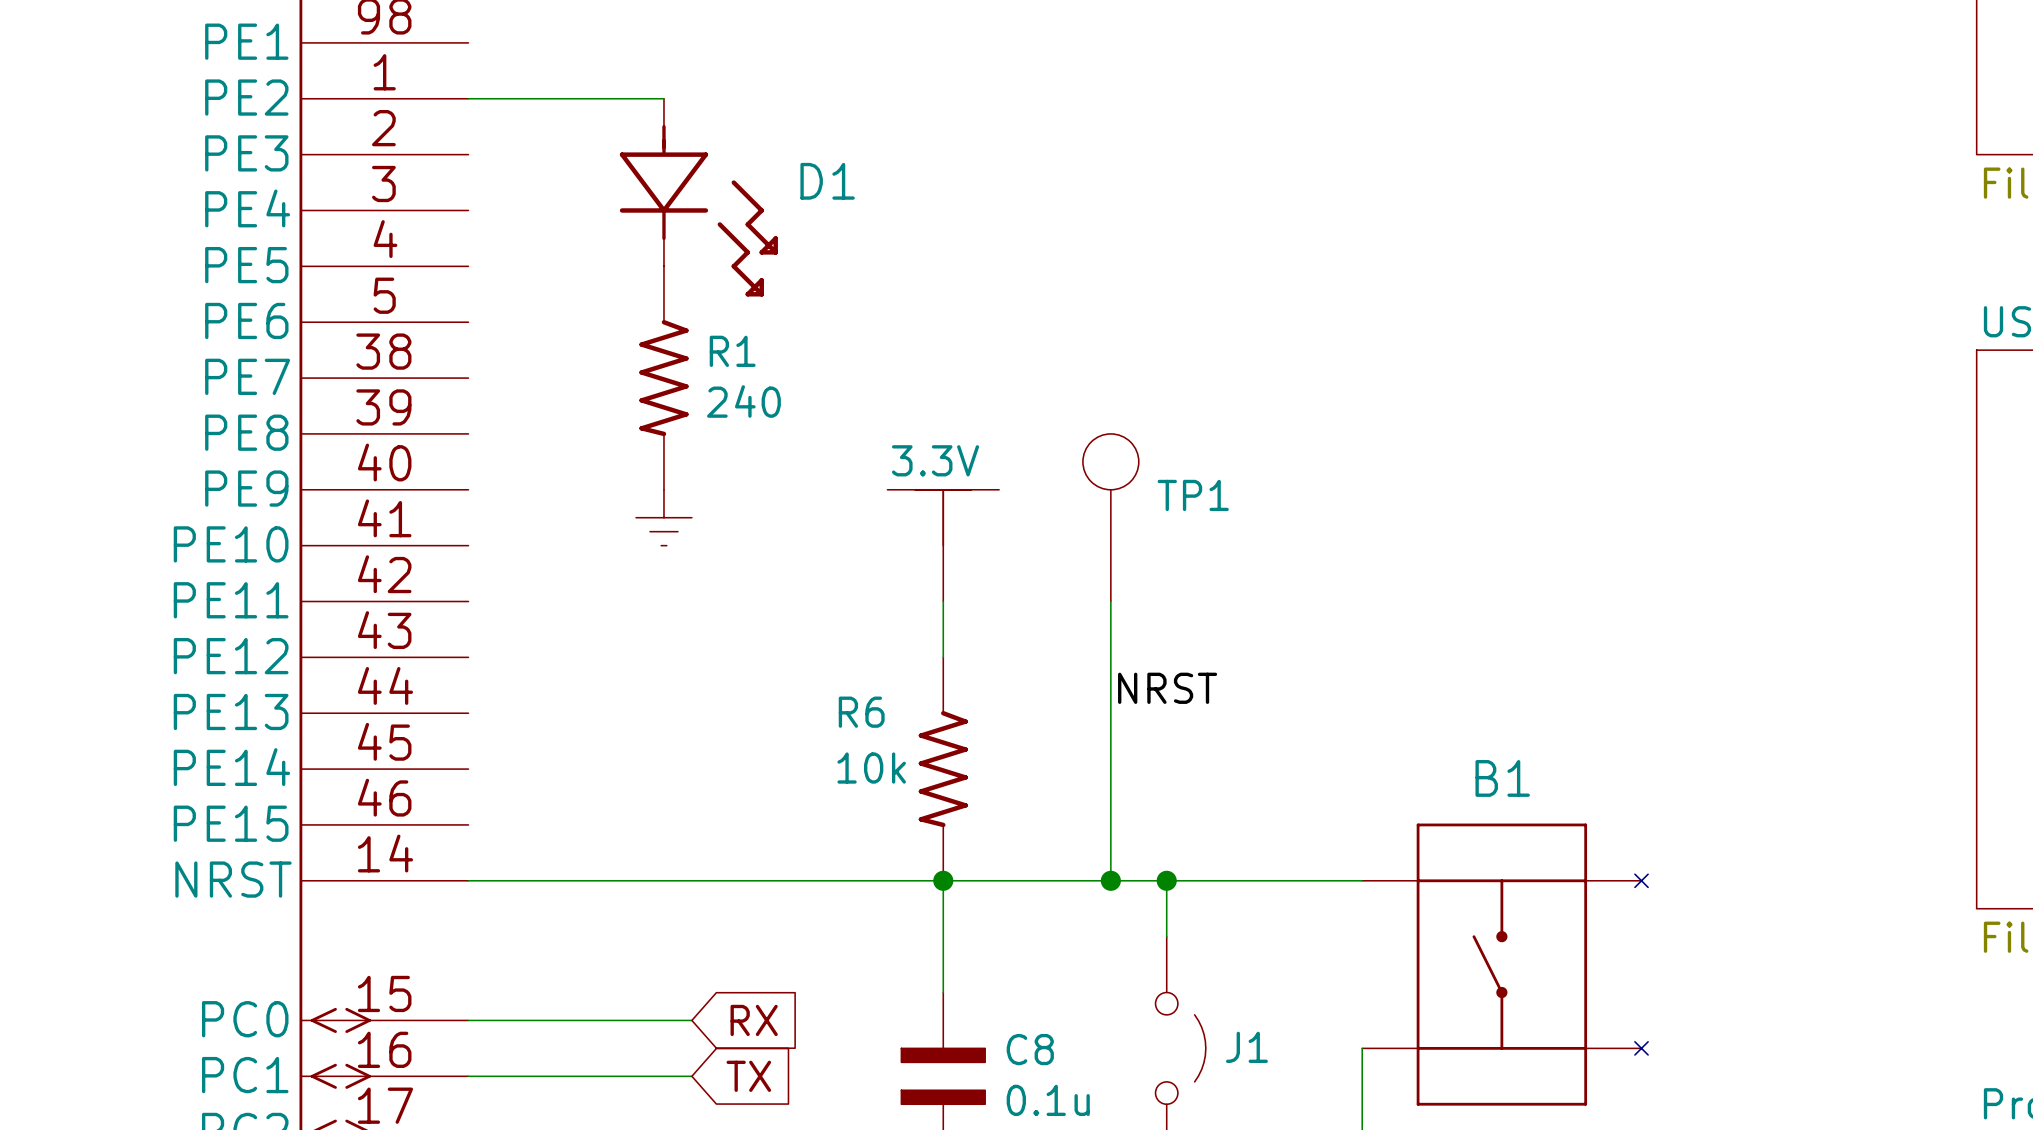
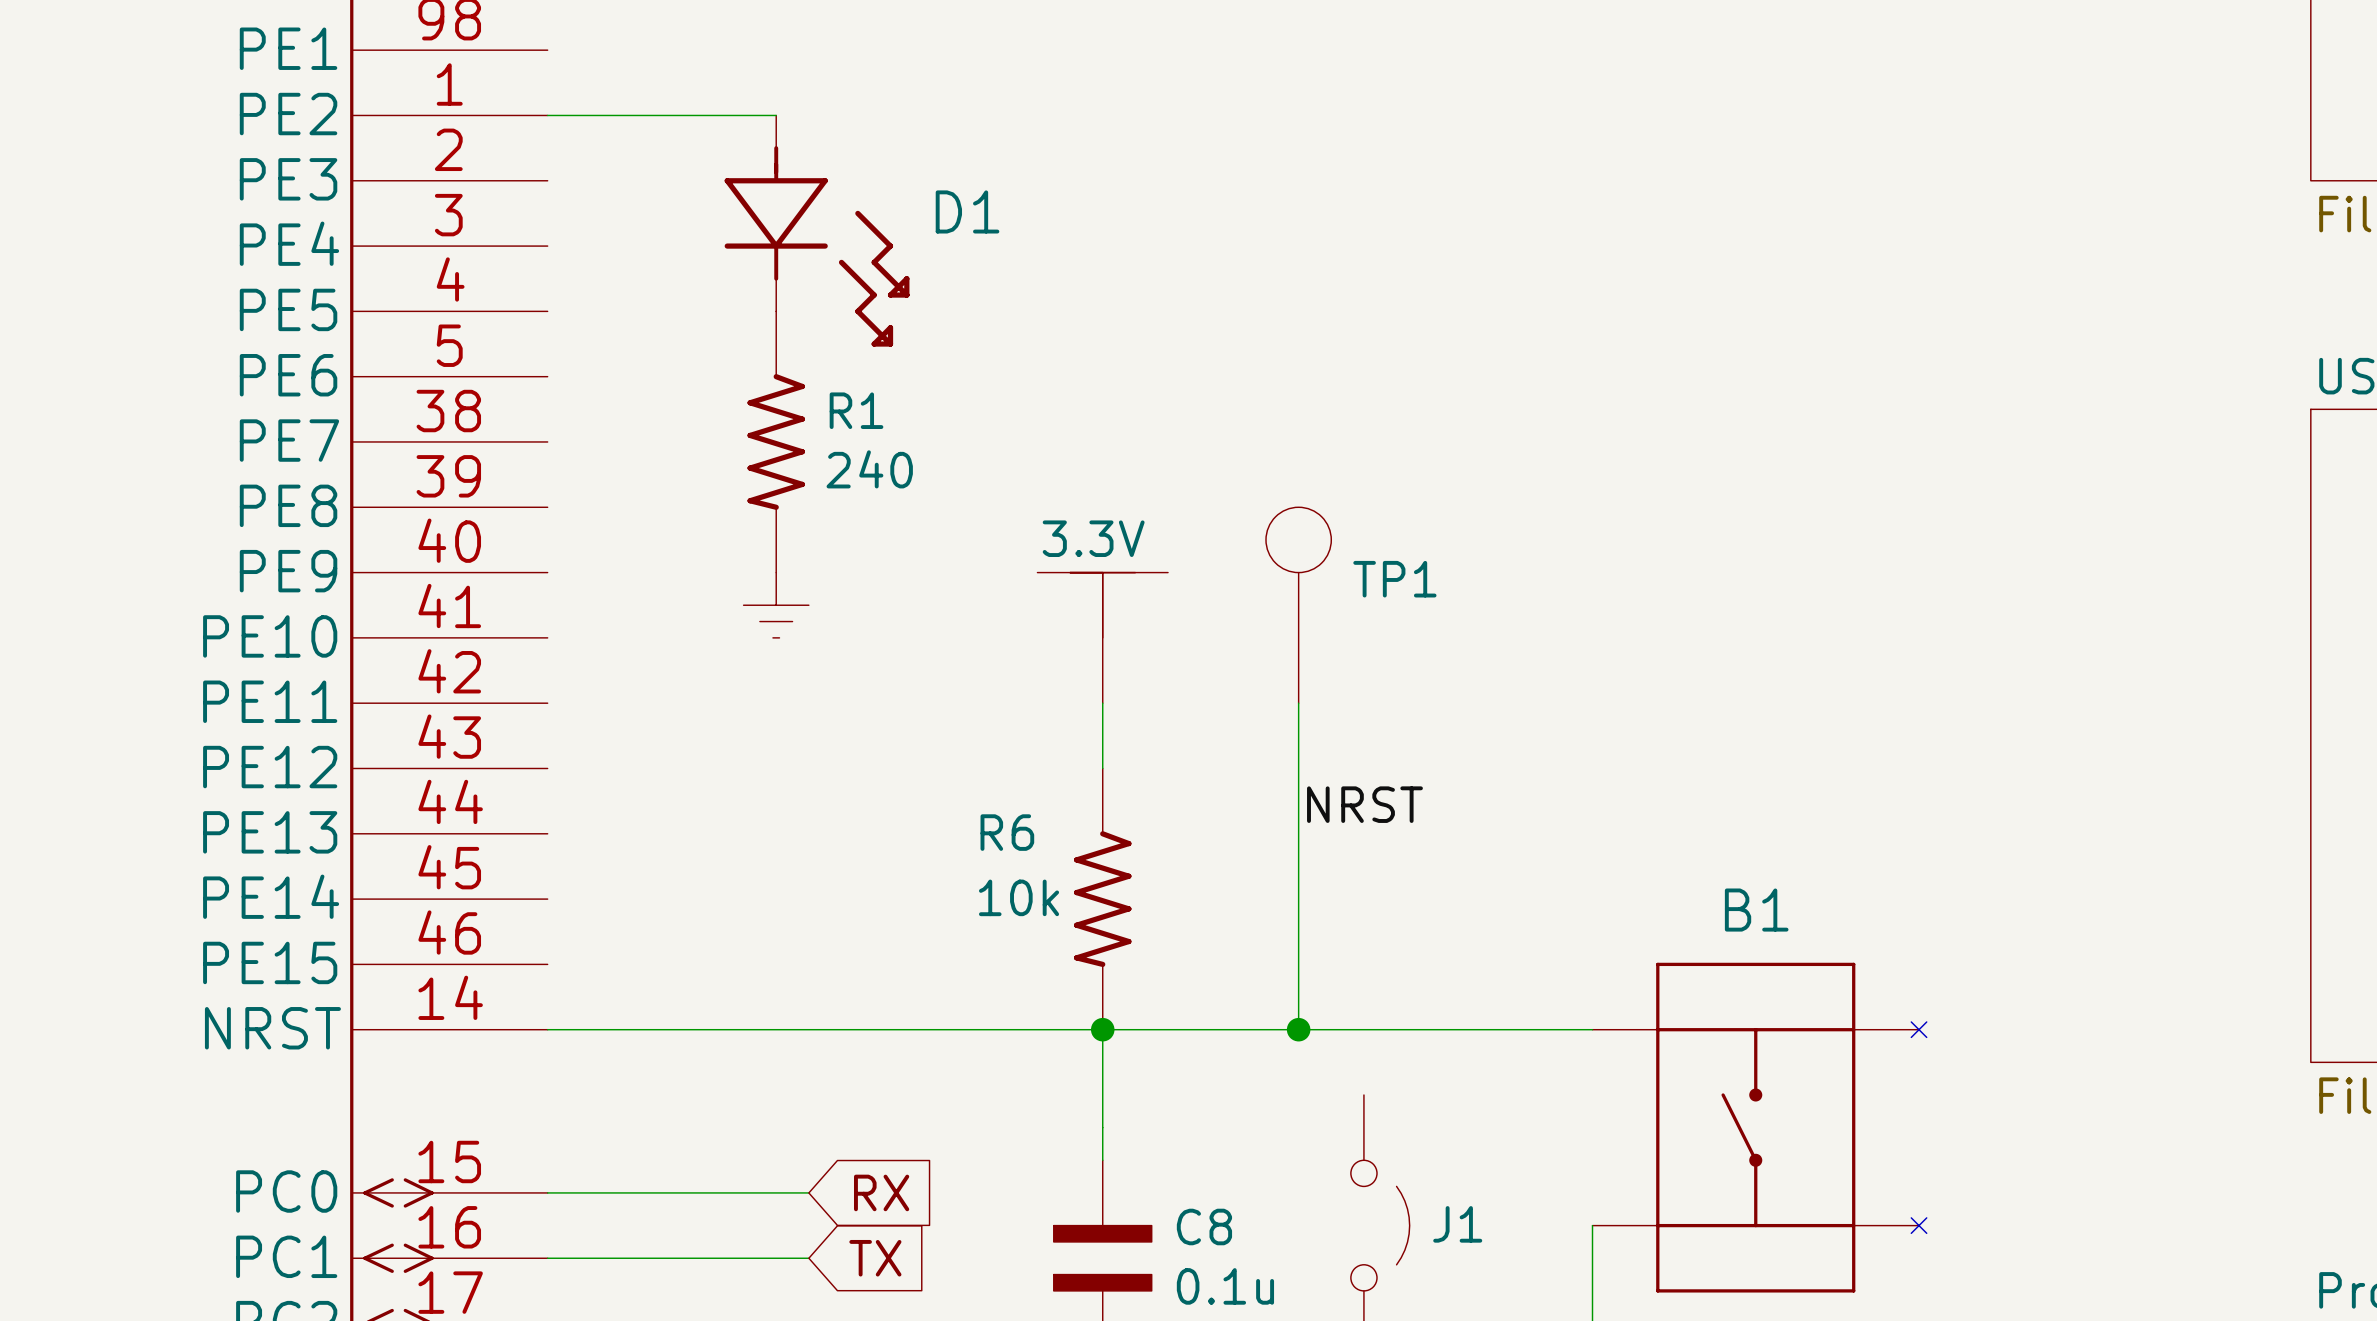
wire: (1166, 880) (1166, 936) -> none
junction: (1166, 880) -> none

